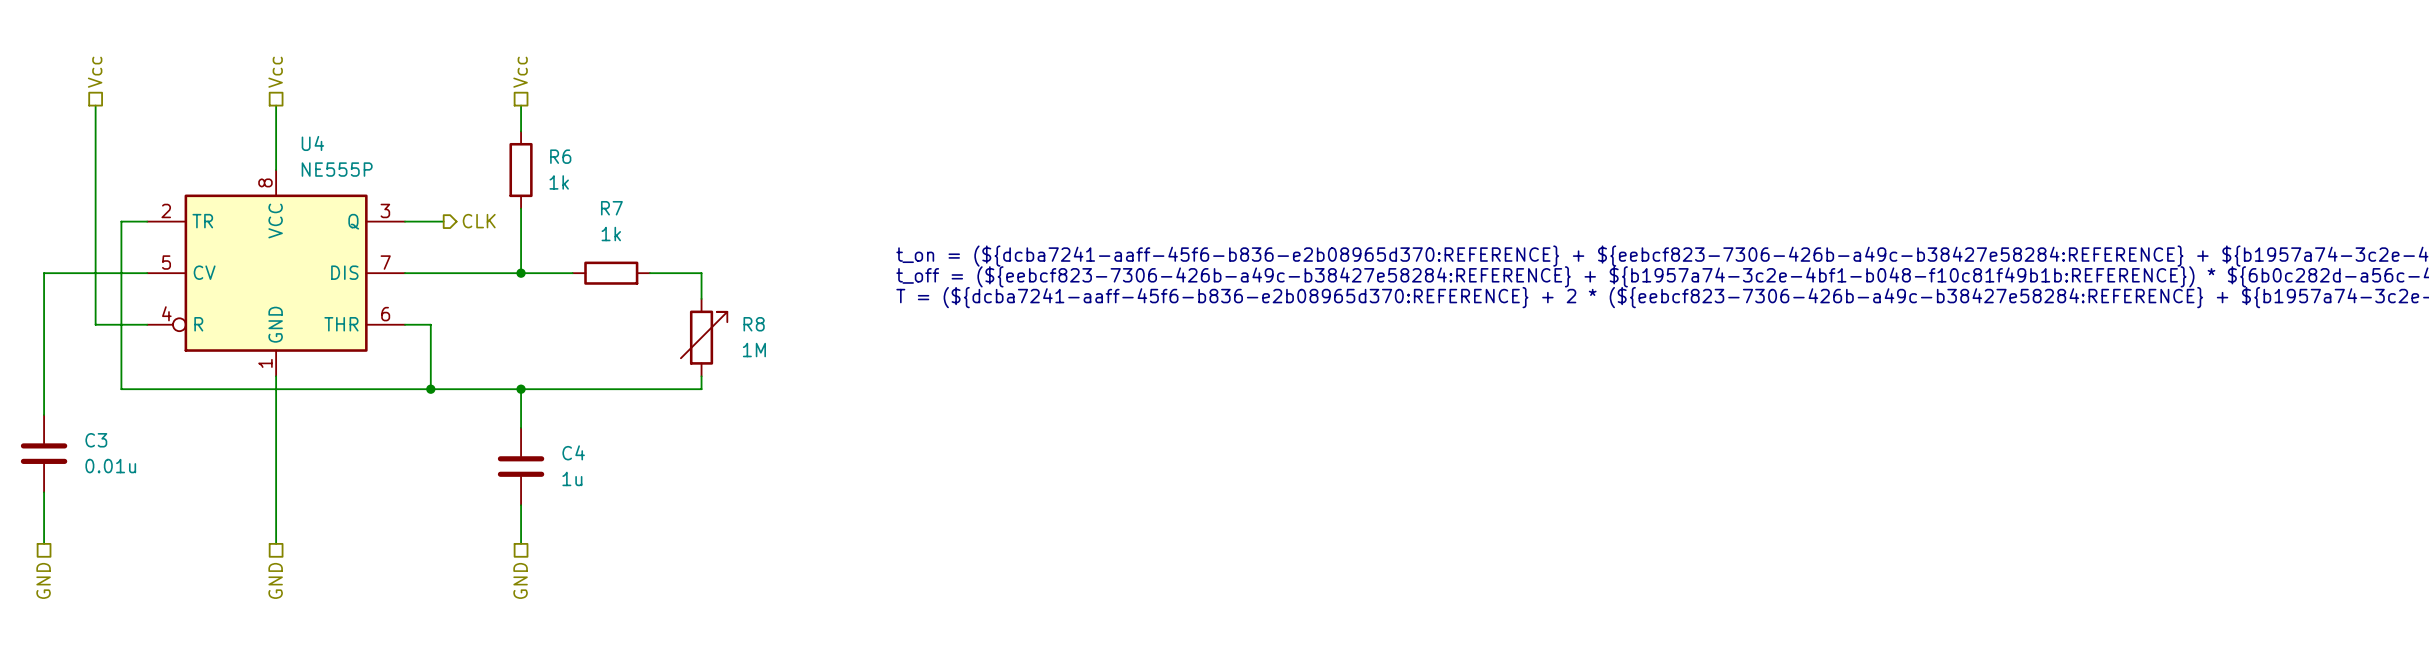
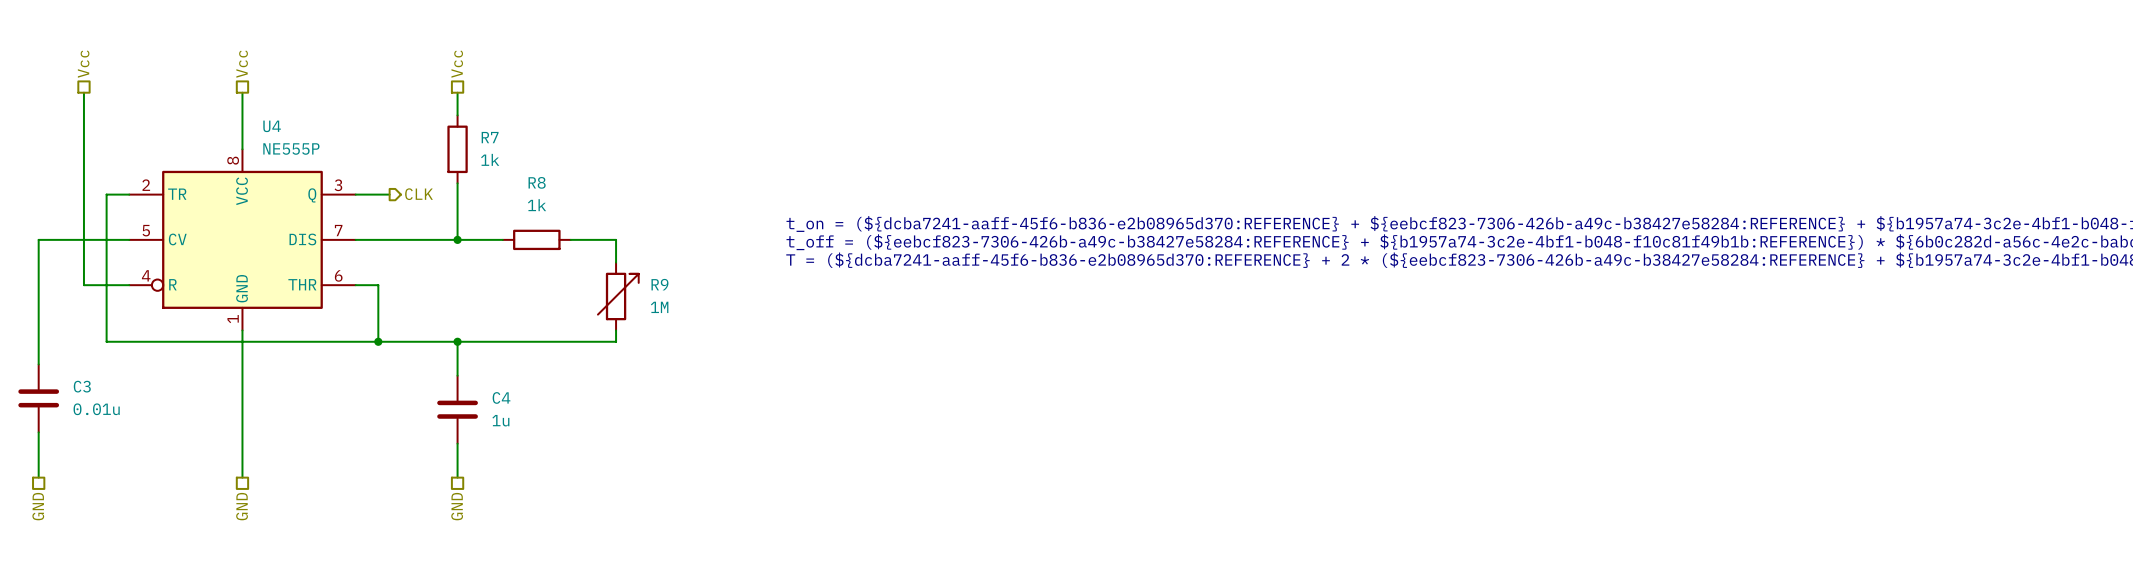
R6 name: R6 (560, 156) -> R7 (490, 137)
R7 name: R7 (611, 208) -> R8 (537, 182)
R8 name: R8 (754, 324) -> R9 (659, 284)

